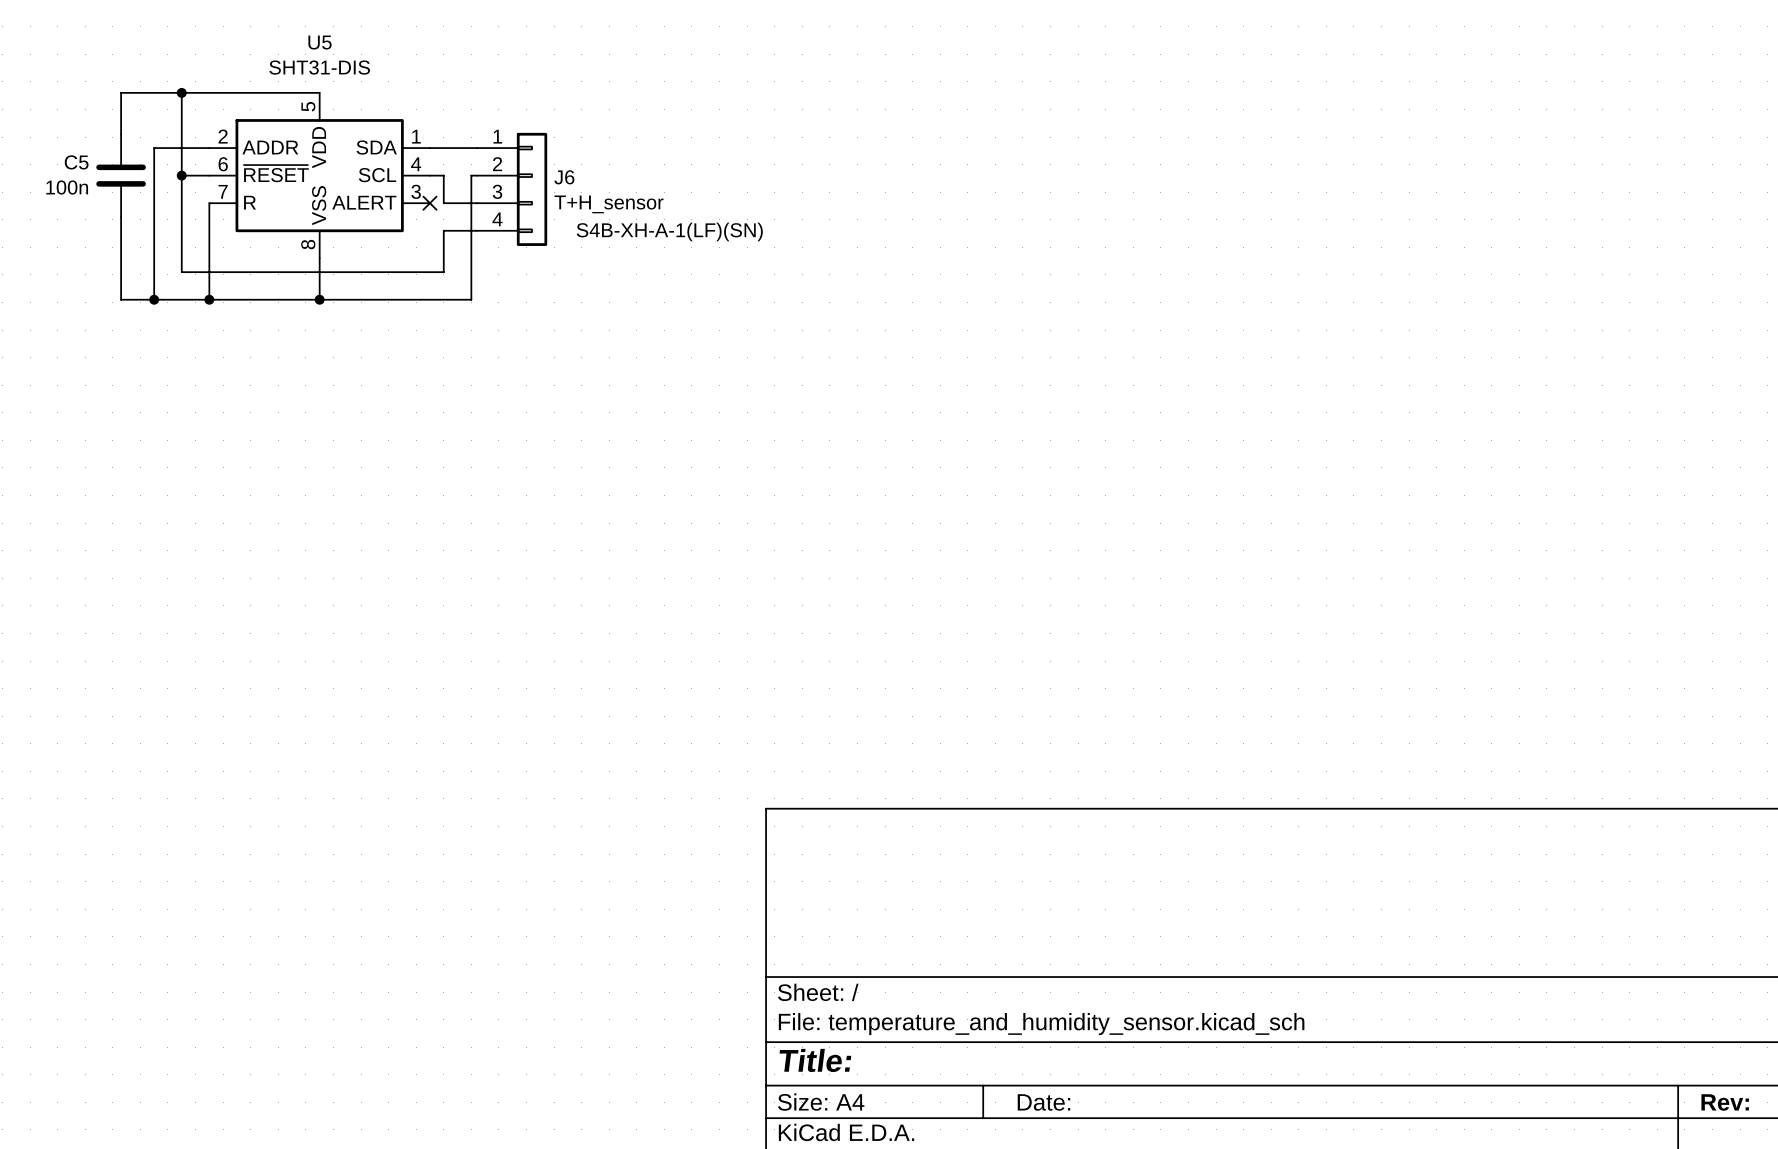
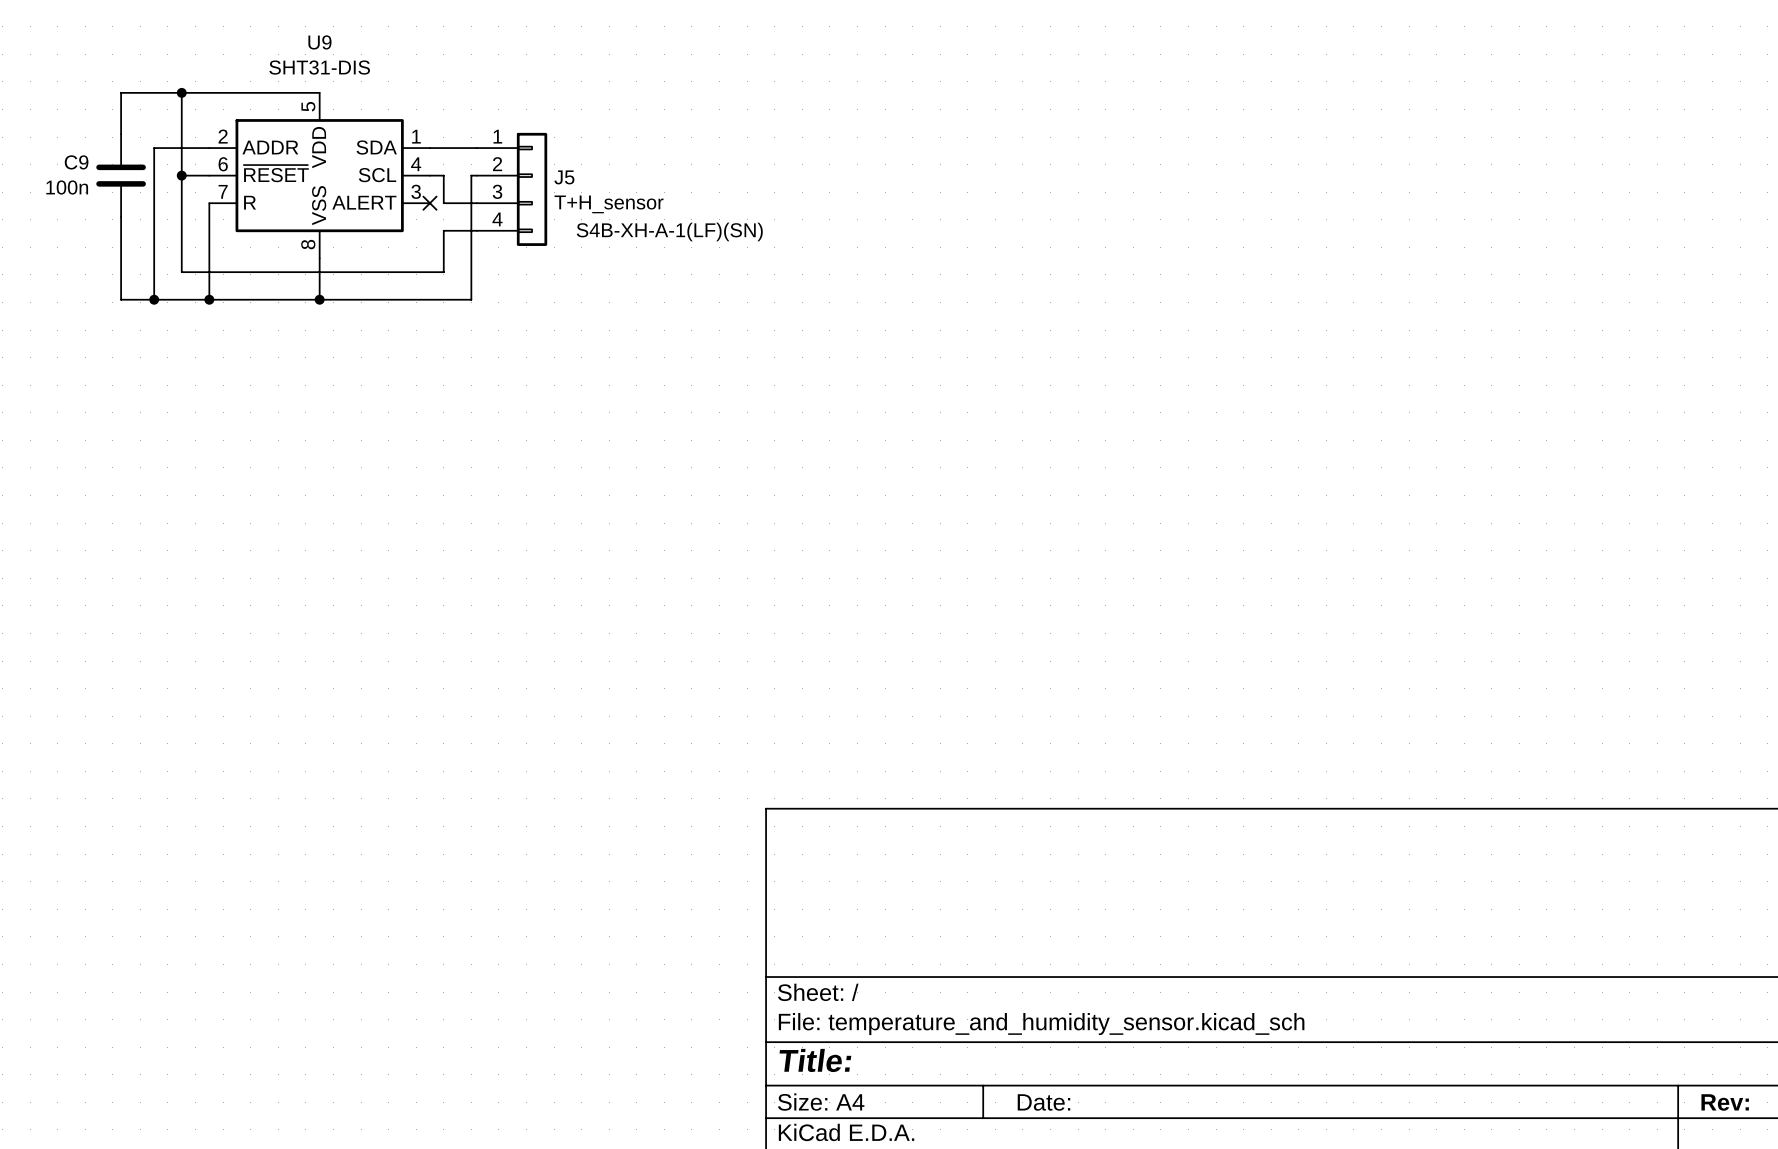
U5 name: U5 (320, 42) -> U9 (319, 42)
C5 name: C5 (76, 162) -> C9 (76, 162)
J6 name: J6 (564, 177) -> J5 (564, 177)

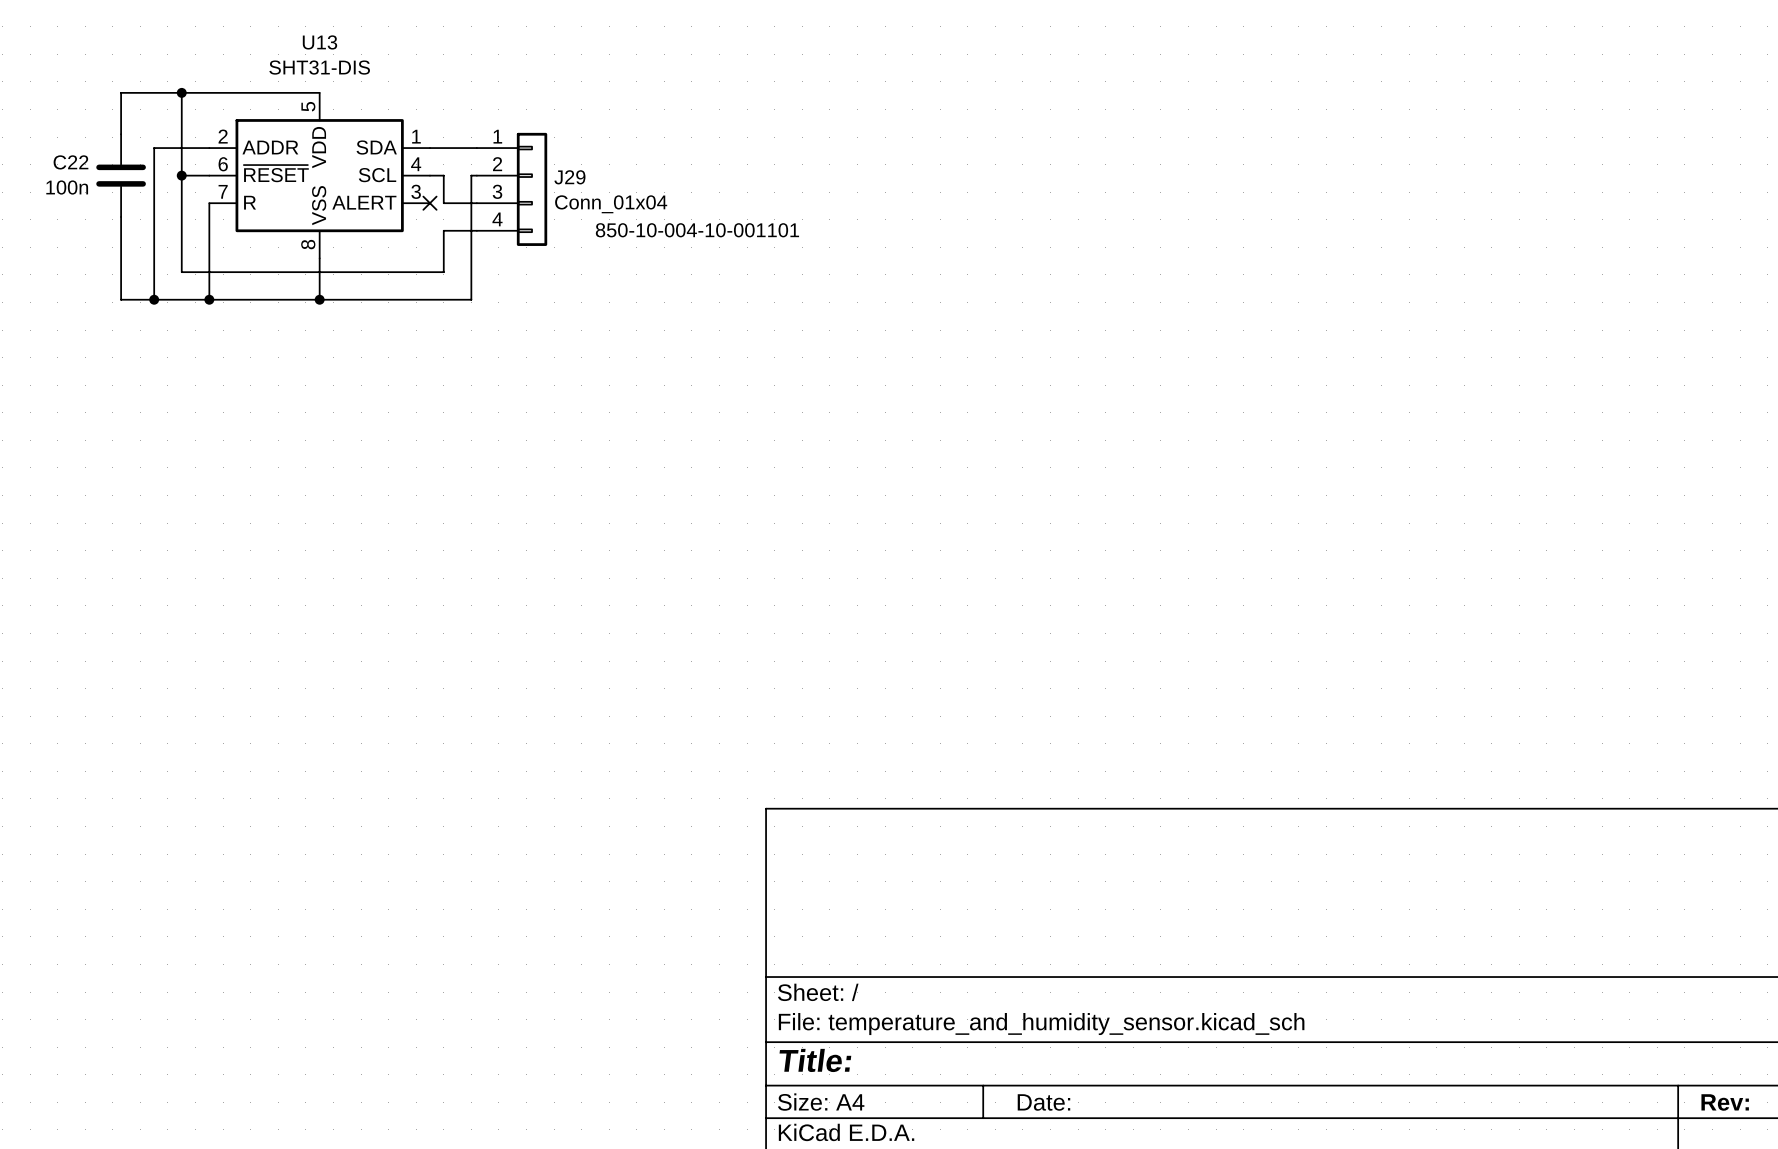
U9 name: U9 (319, 42) -> U13 (319, 42)
C9 name: C9 (76, 162) -> C22 (70, 162)
J5 name: J5 (564, 177) -> J29 (569, 177)
J5 value: T+H_sensor (609, 204) -> Conn_01x04 (611, 204)
J5 text: S4B-XH-A-1(LF)(SN) (669, 231) -> 850-10-004-10-001101 (697, 230)

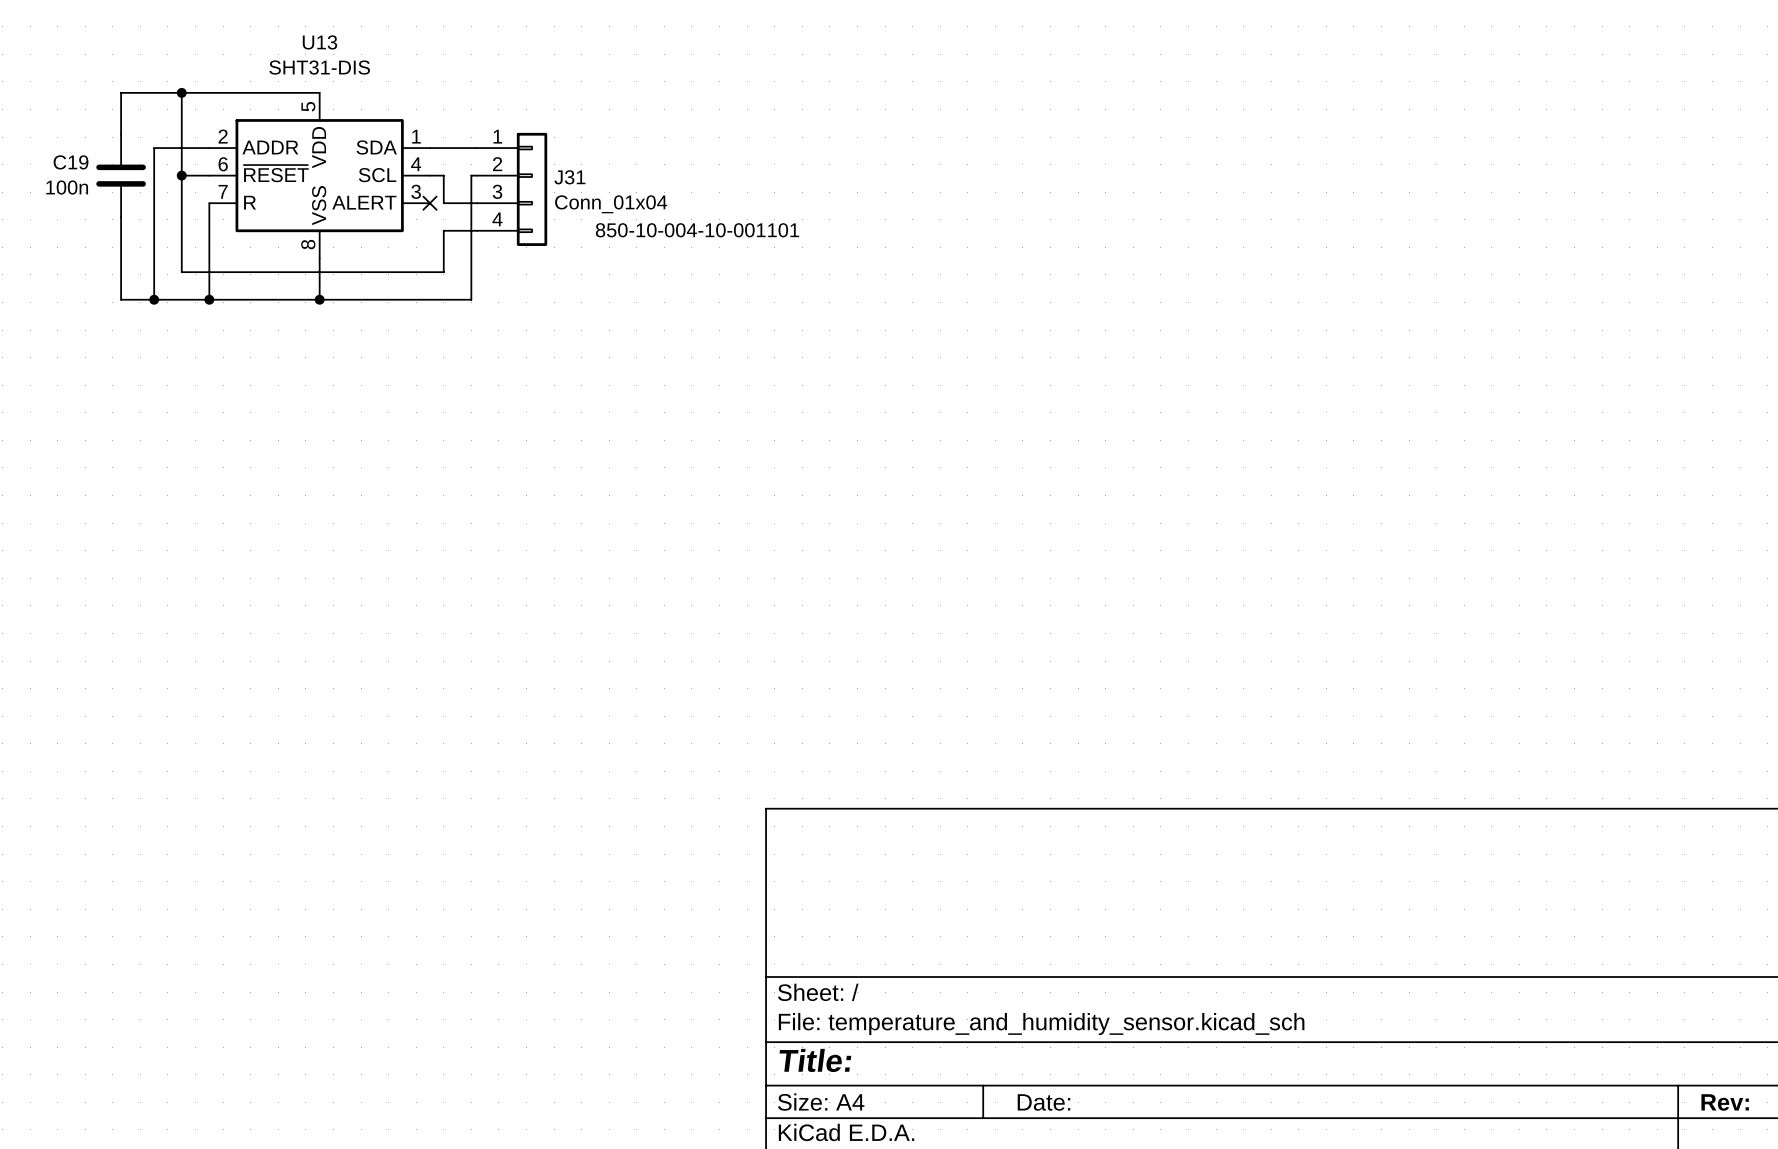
C22 name: C22 (70, 162) -> C19 (71, 162)
J29 name: J29 (569, 177) -> J31 (569, 177)

